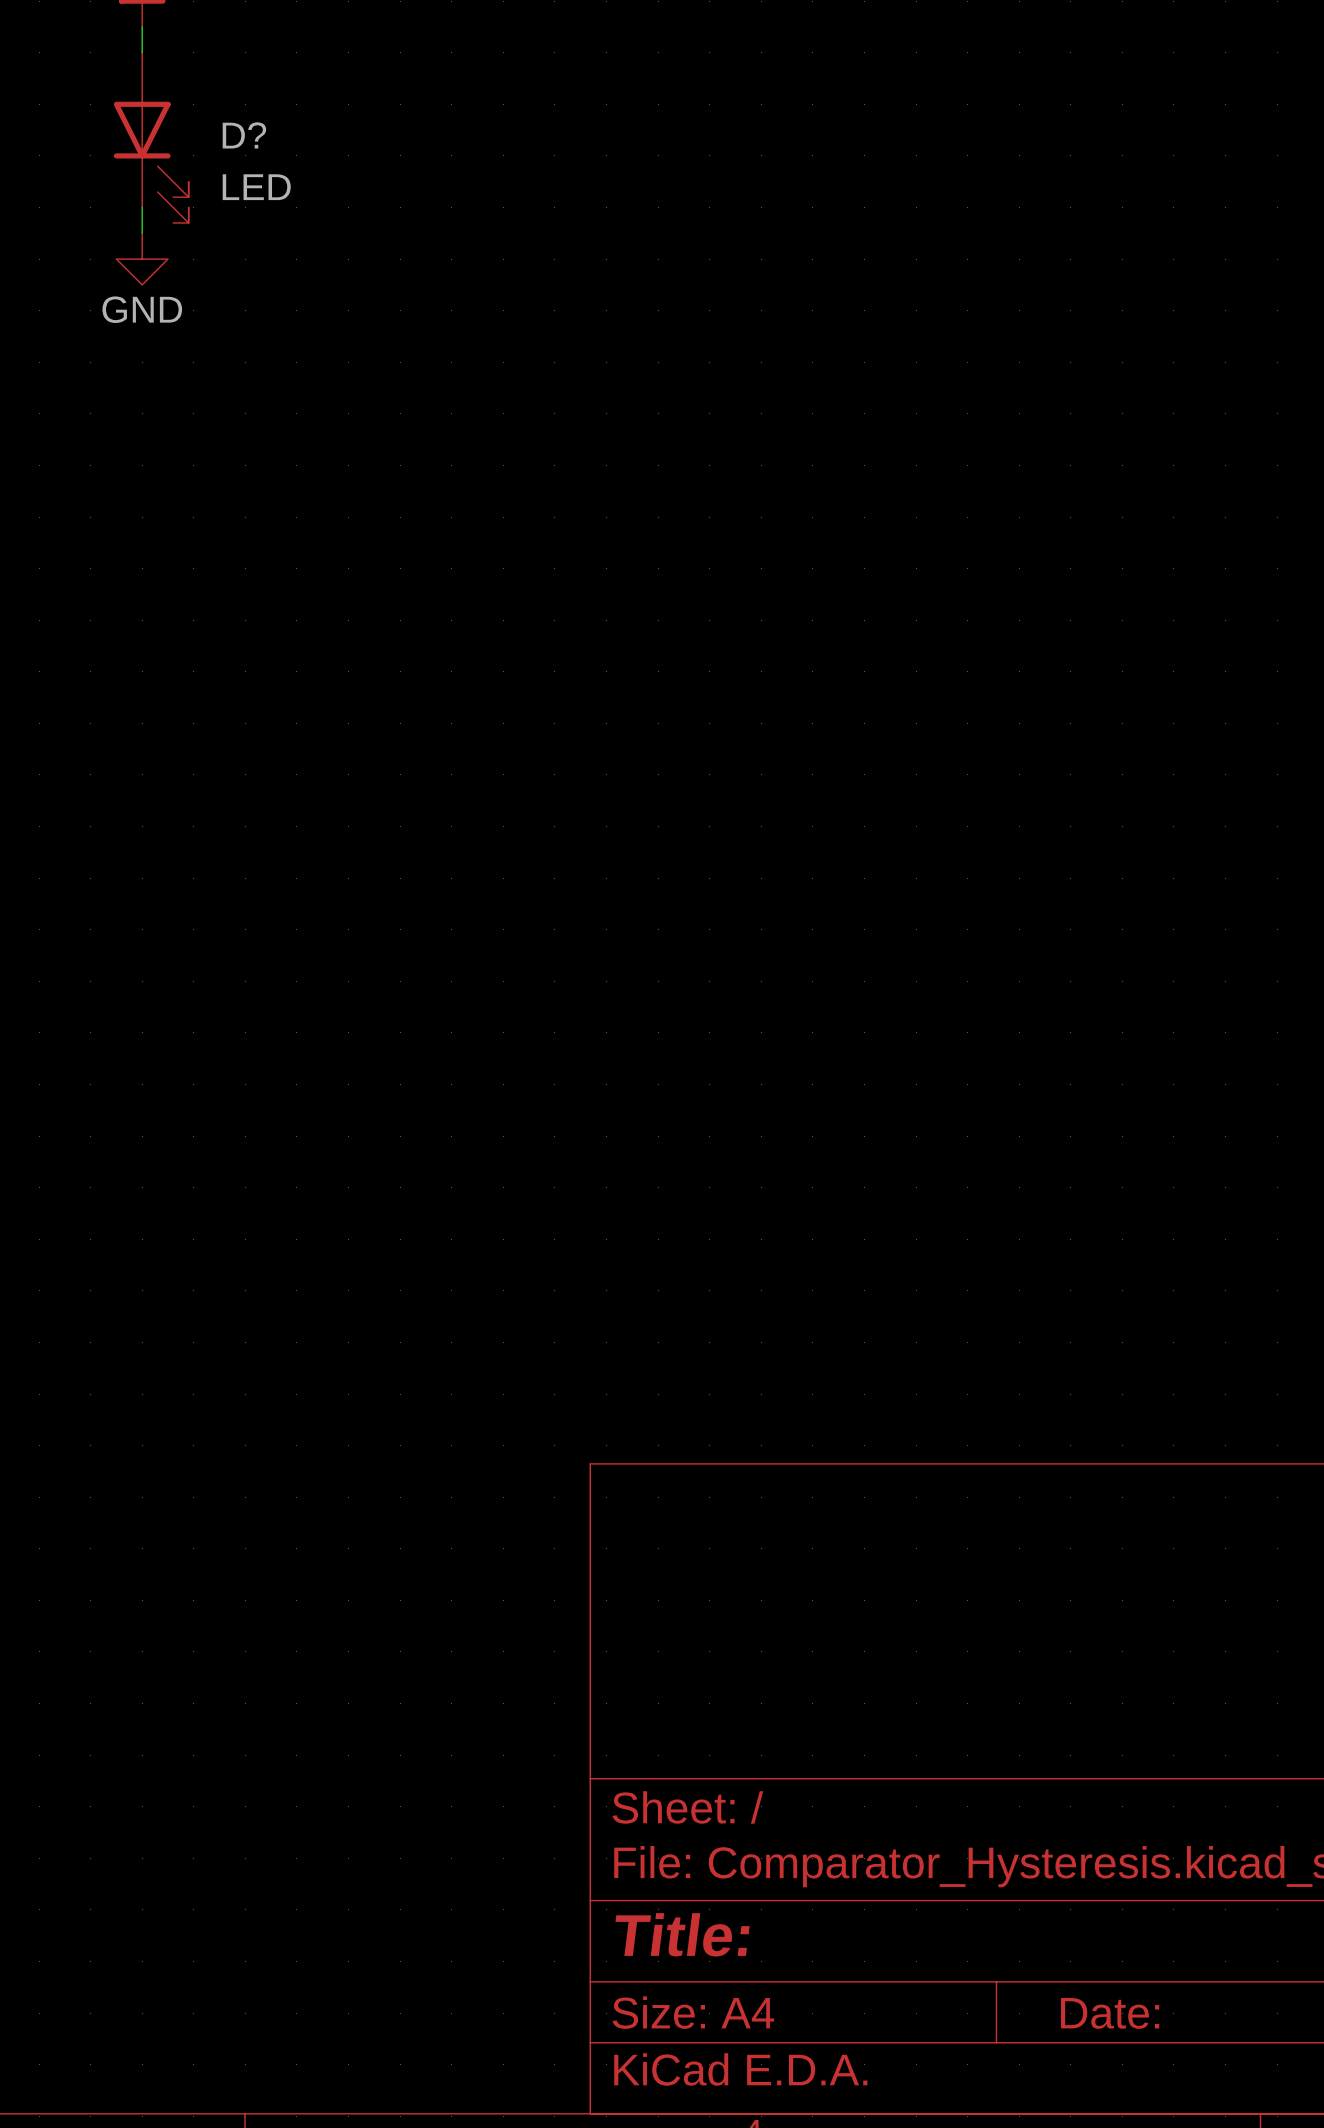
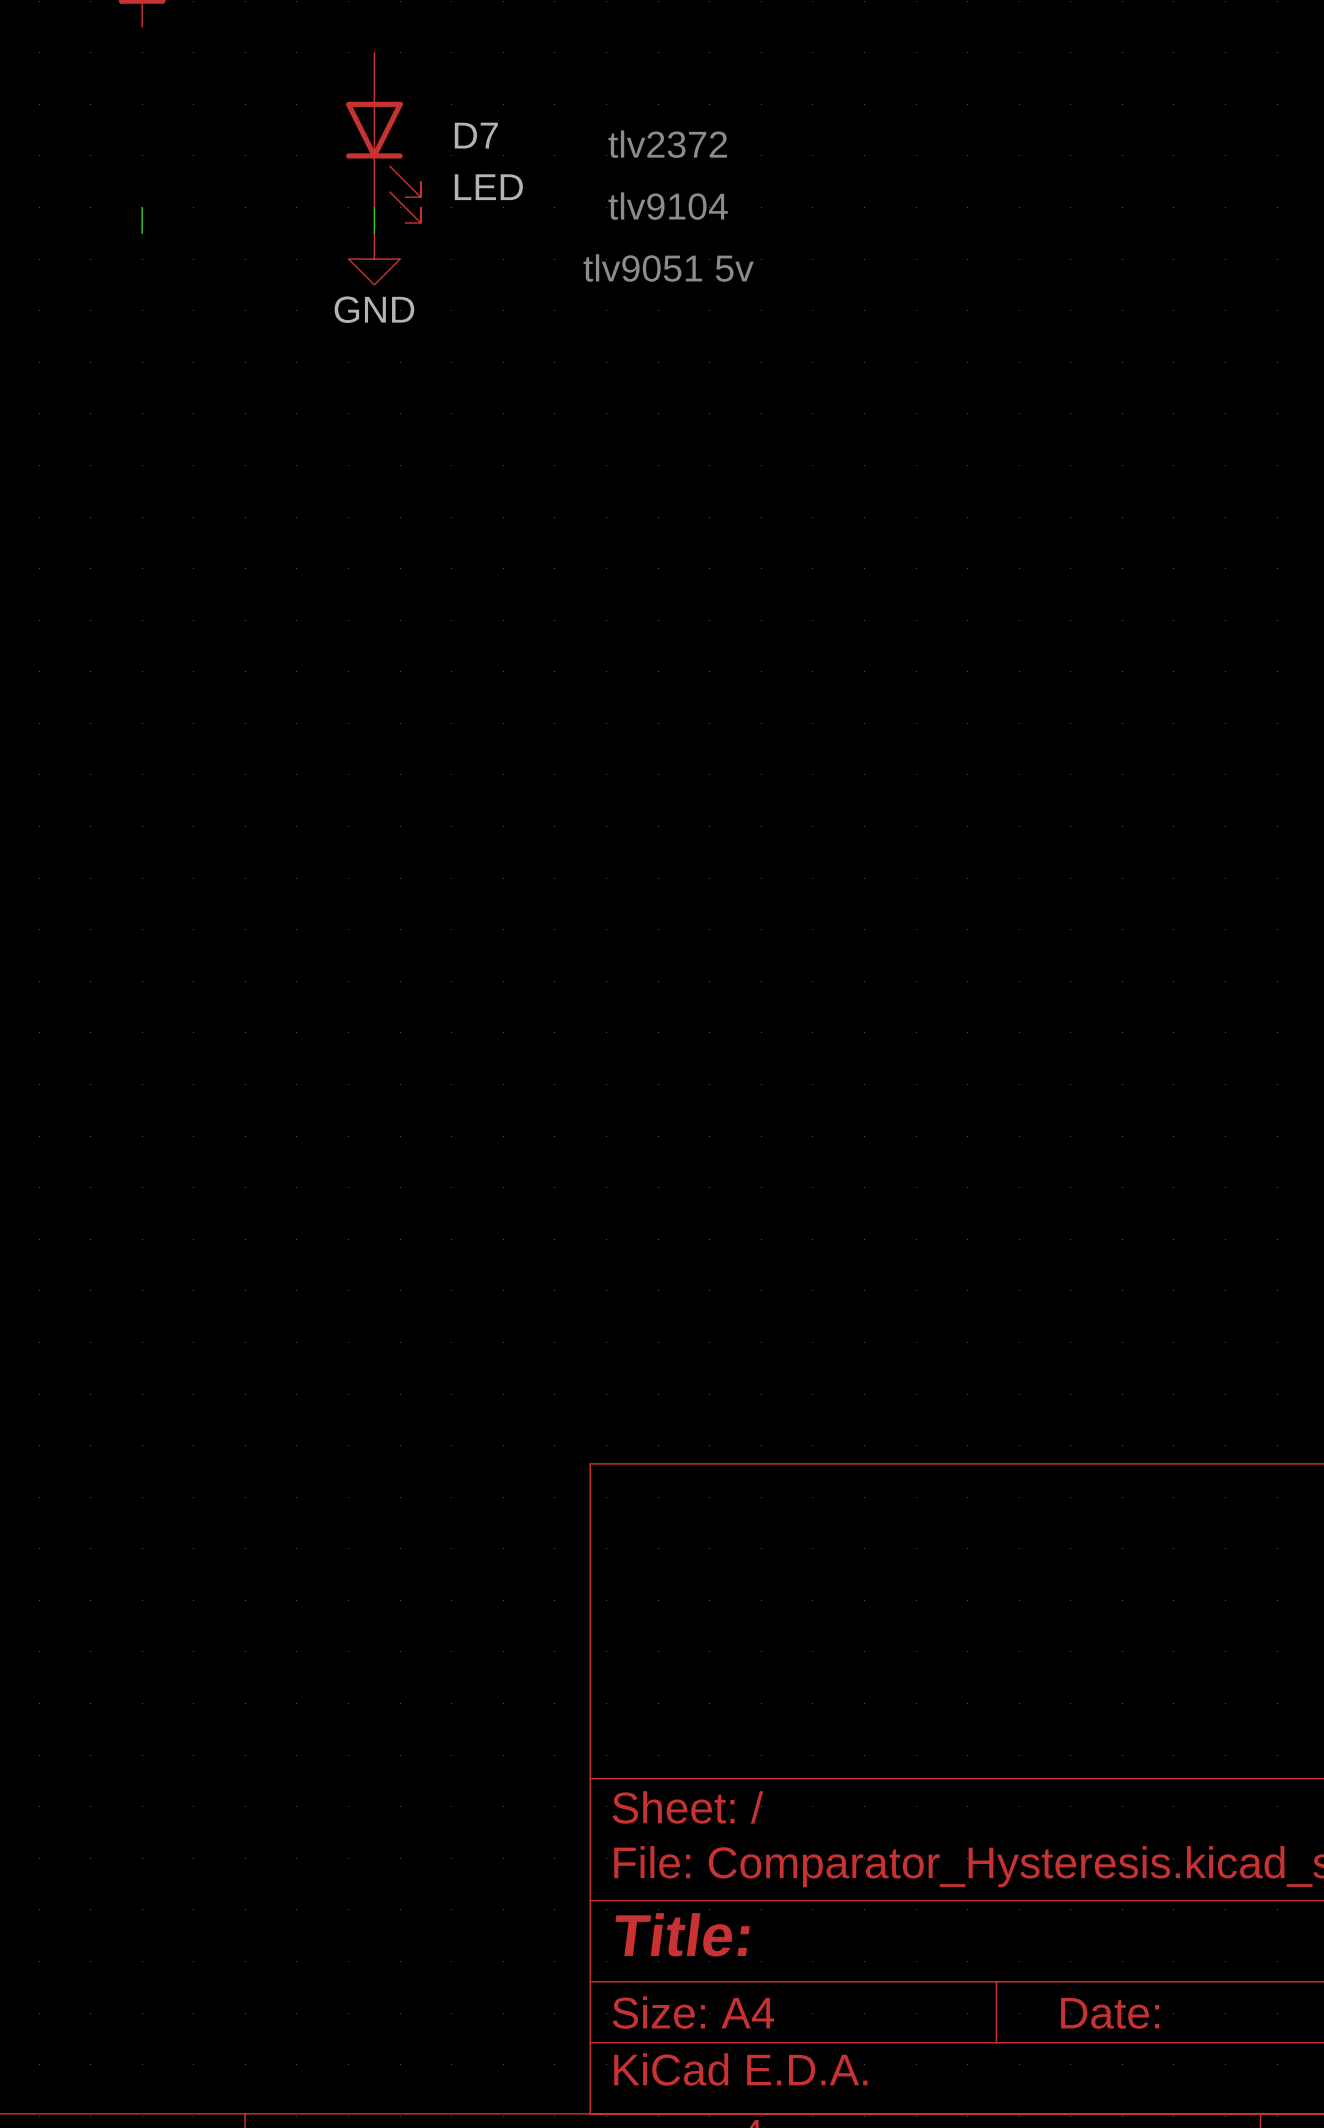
wire: (142, 26) (142, 52) -> (374, 207) (374, 233)
D?: LED (151, 137) -> none
D7: none -> LED (383, 137)
text: none -> tlv2372 (667, 144)
text: none -> tlv9104 (668, 206)
power symbol position: GND (142, 259) -> GND (374, 259)
text: none -> tlv9051 5v (668, 268)

